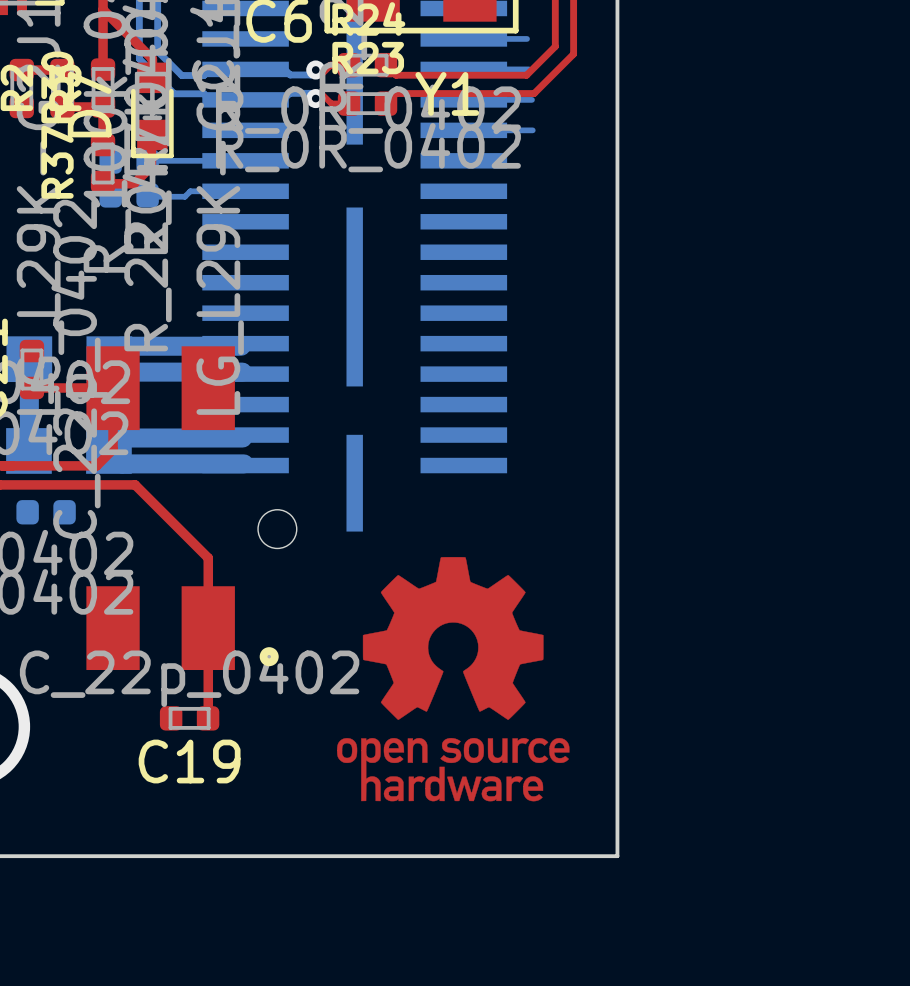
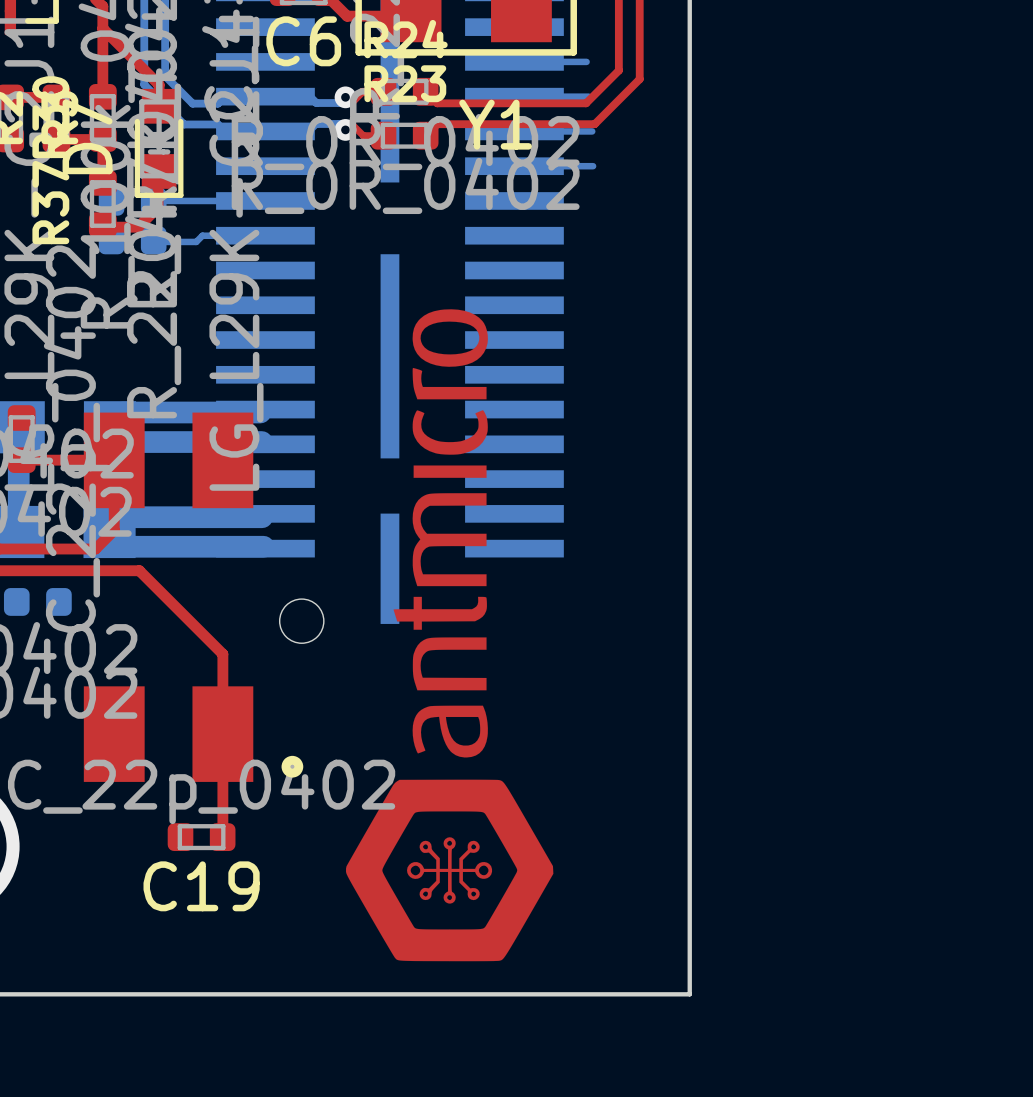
drawing: none -> [345, 309, 554, 962]
drawing: [336, 557, 570, 802] -> none

